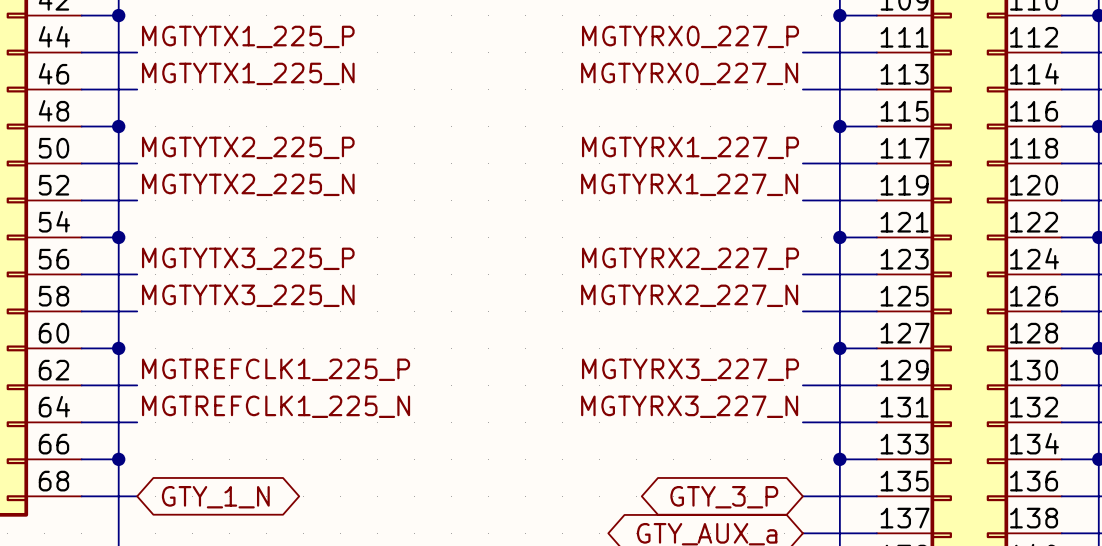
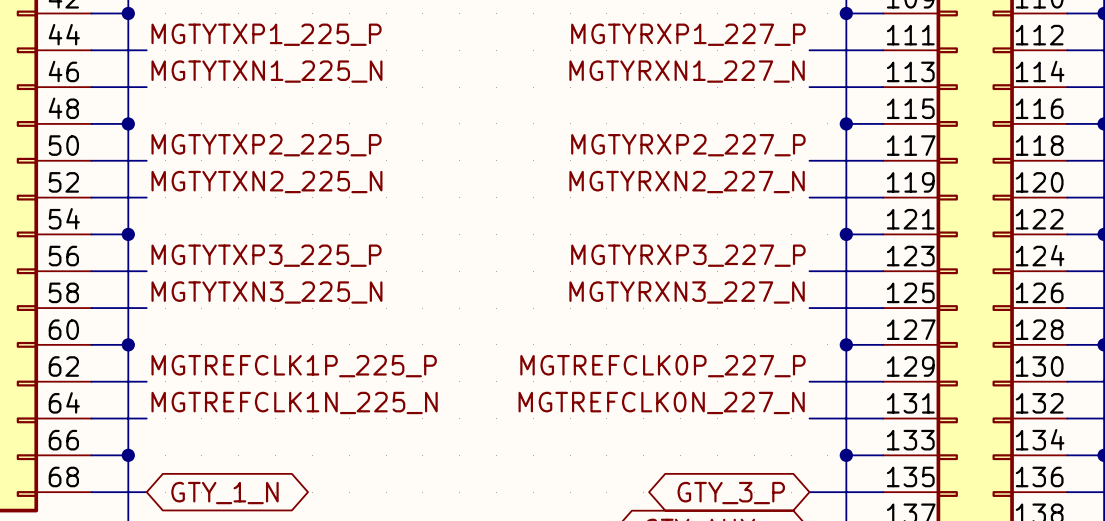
label: MGTYTX1_225_P (248, 36) -> MGTYTXP1_225_P (266, 34)
label: MGTYRX0_227_P (690, 36) -> MGTYRXP1_227_P (688, 34)
label: MGTYTX1_225_N (248, 73) -> MGTYTXN1_225_N (266, 71)
label: MGTYRX0_227_N (689, 73) -> MGTYRXN1_227_N (687, 71)
label: MGTYTX2_225_P (248, 147) -> MGTYTXP2_225_P (266, 145)
label: MGTYRX1_227_P (690, 147) -> MGTYRXP2_227_P (688, 145)
label: MGTYTX2_225_N (248, 184) -> MGTYTXN2_225_N (266, 182)
label: MGTYRX1_227_N (689, 184) -> MGTYRXN2_227_N (687, 182)
label: MGTYTX3_225_P (248, 258) -> MGTYTXP3_225_P (266, 255)
label: MGTYRX2_227_P (690, 258) -> MGTYRXP3_227_P (688, 255)
label: MGTYTX3_225_N (248, 295) -> MGTYTXN3_225_N (266, 292)
label: MGTYRX2_227_N (689, 295) -> MGTYRXN3_227_N (687, 292)
label: MGTREFCLK1_225_P (276, 369) -> MGTREFCLK1P_225_P (294, 366)
label: MGTYRX3_227_P (690, 369) -> MGTREFCLK0P_227_P (662, 366)
label: MGTREFCLK1_225_N (276, 406) -> MGTREFCLK1N_225_N (294, 402)
label: MGTYRX3_227_N (689, 406) -> MGTREFCLK0N_227_N (661, 402)

